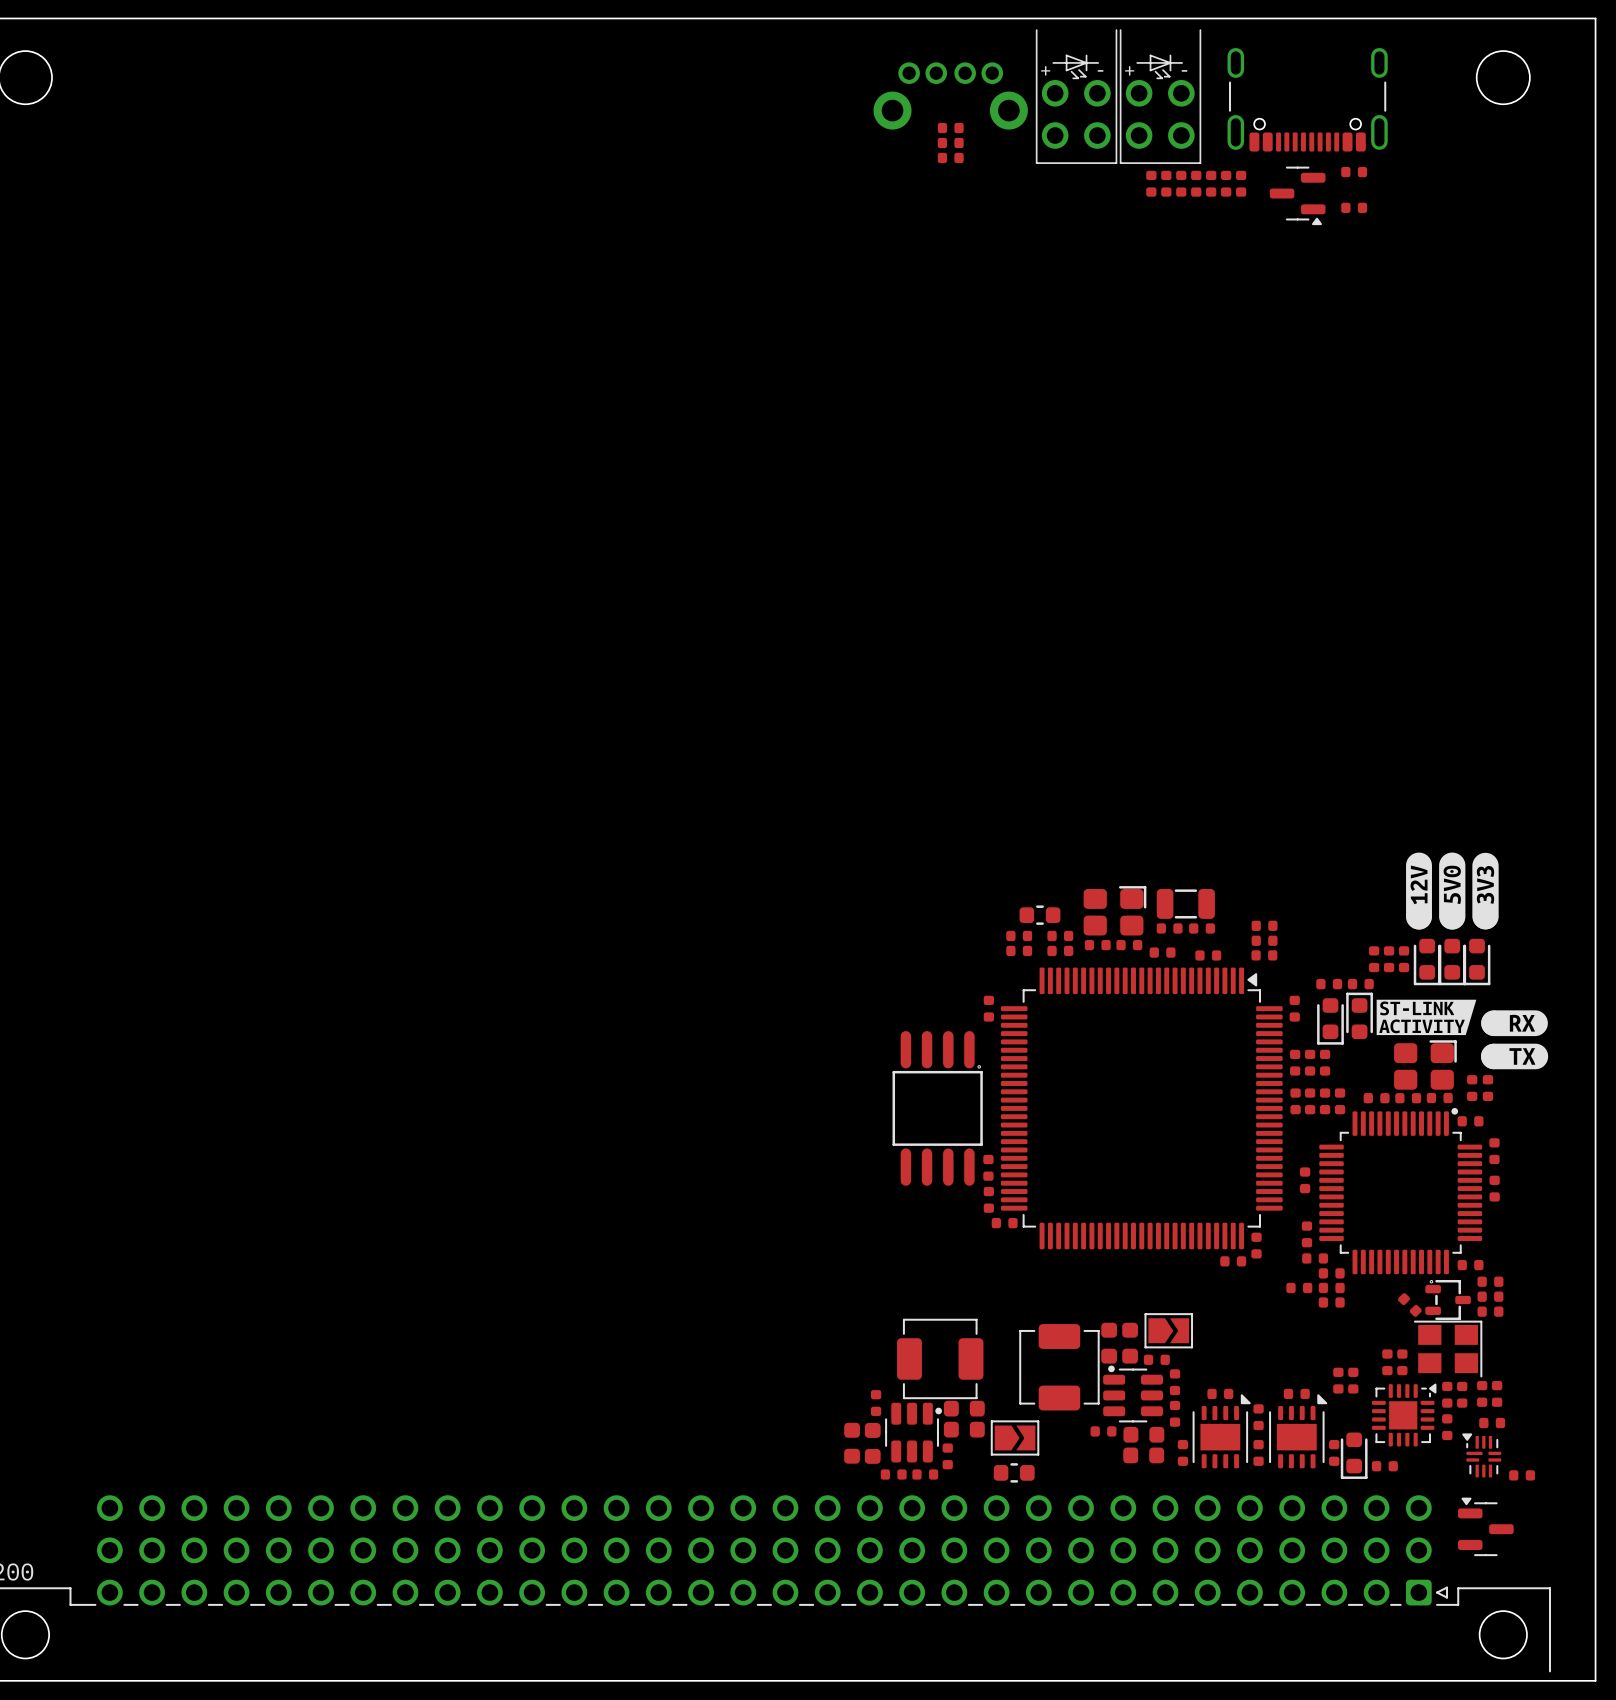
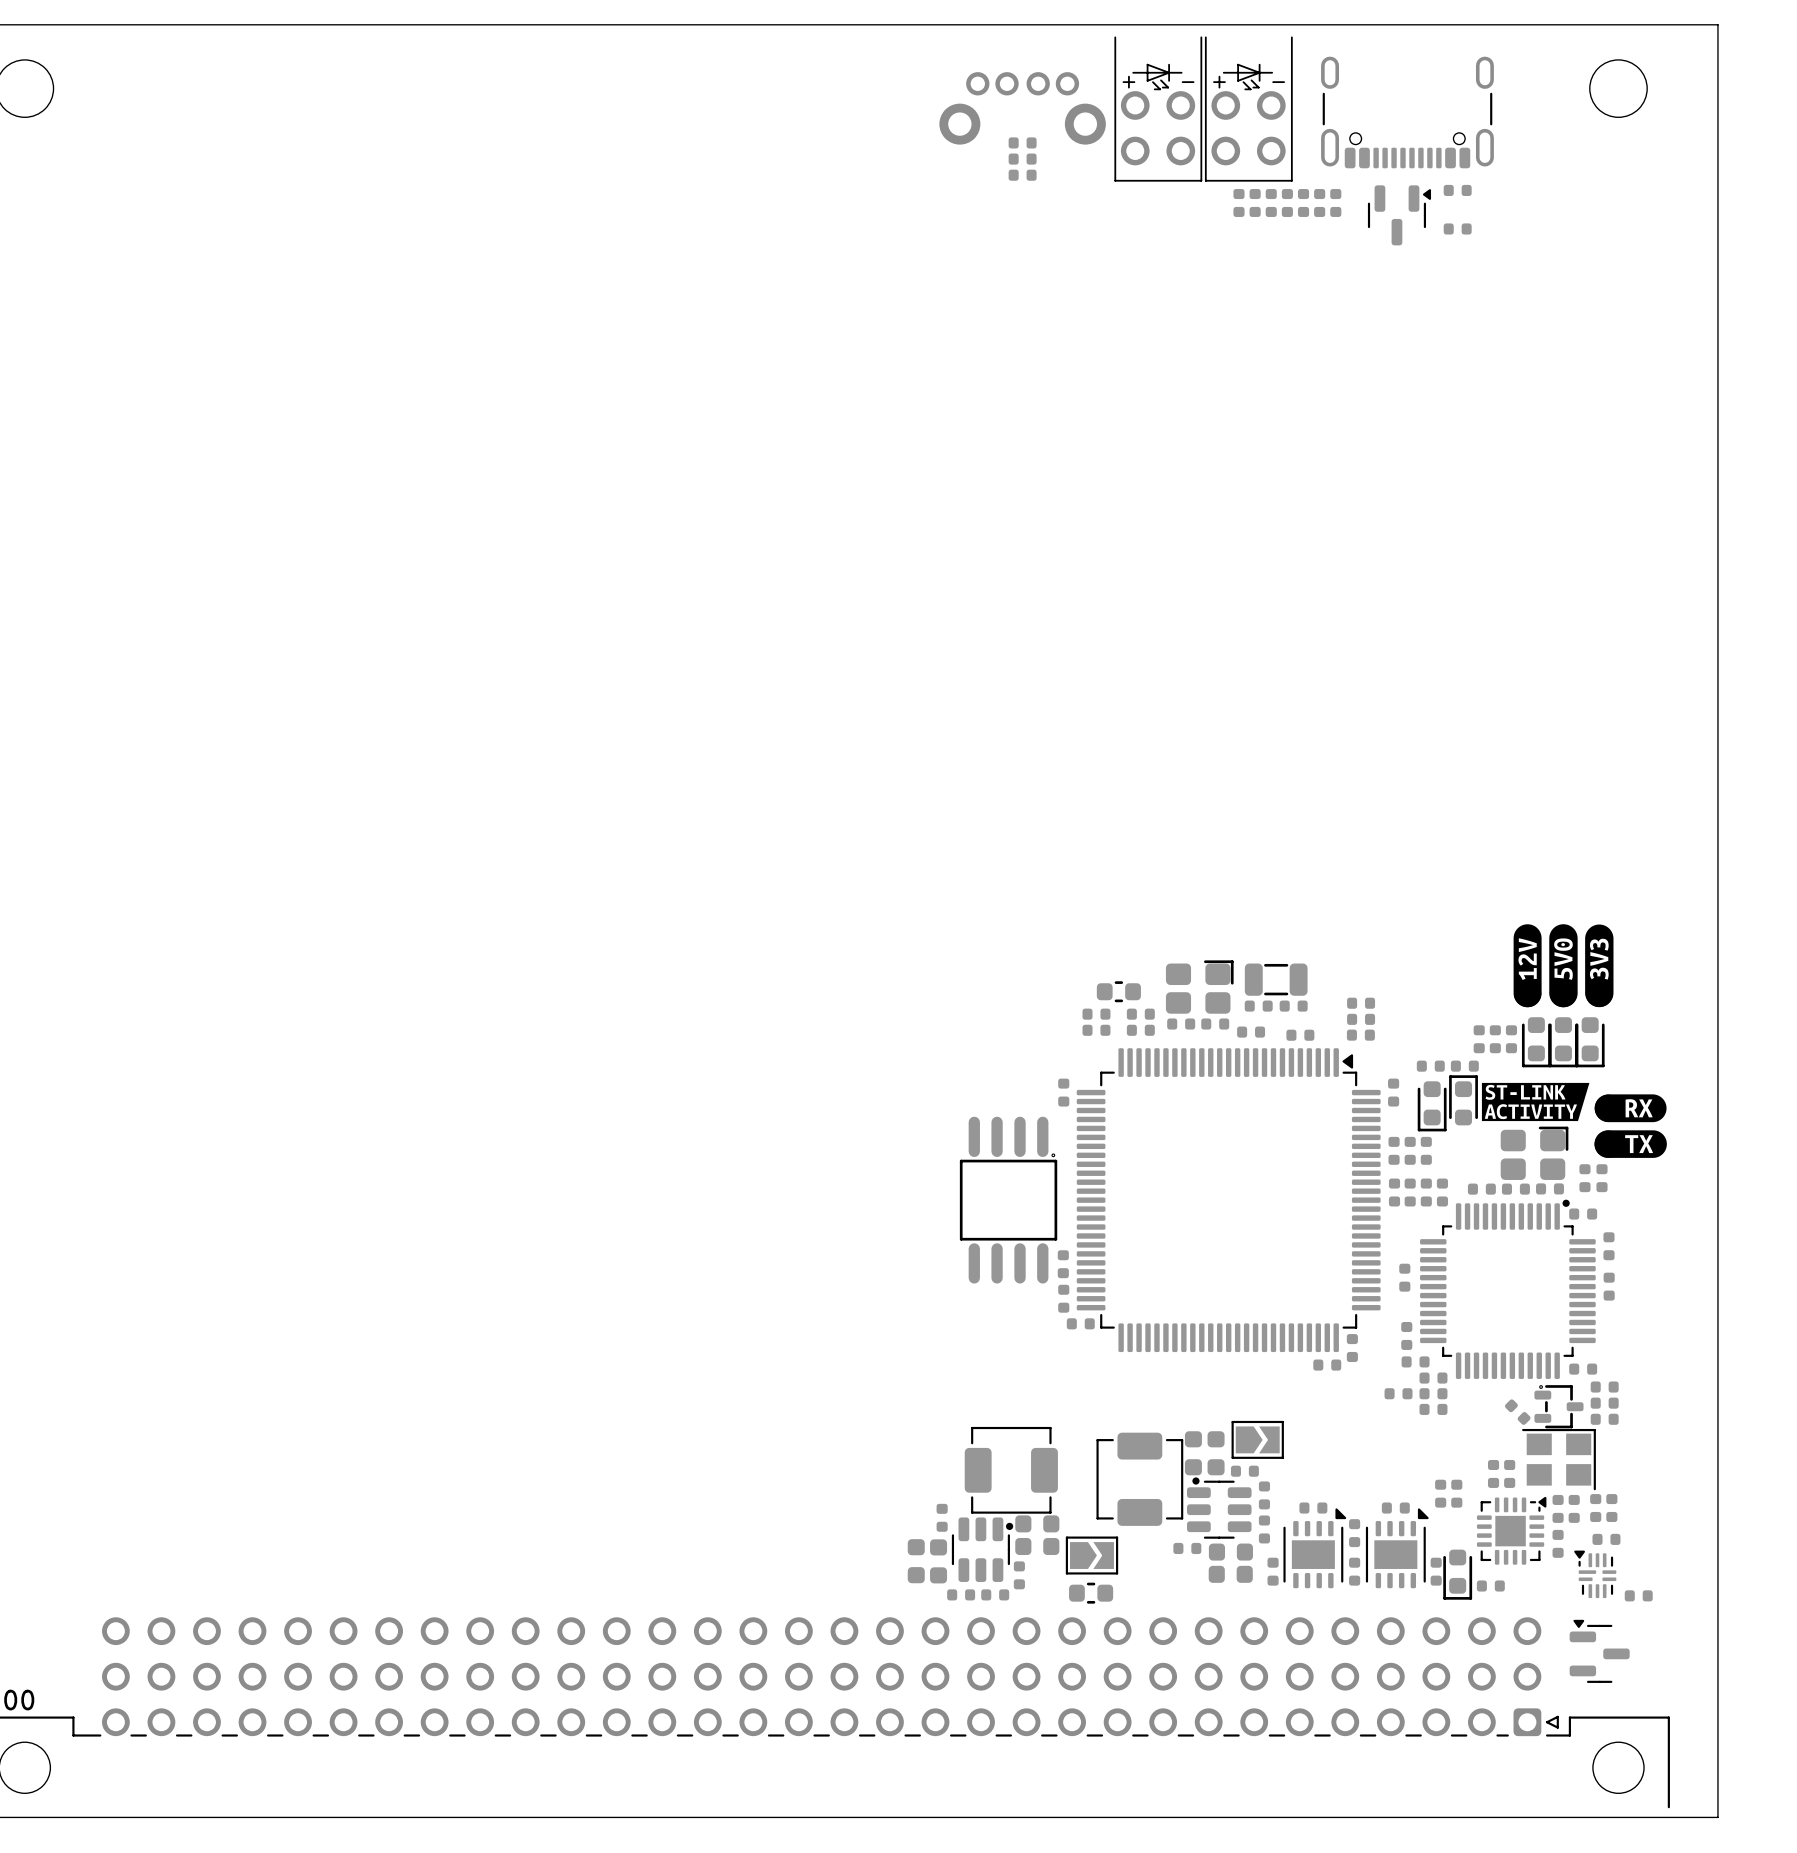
part rotation: 0° (1297, 195) -> 90° counterclockwise (1399, 215)

